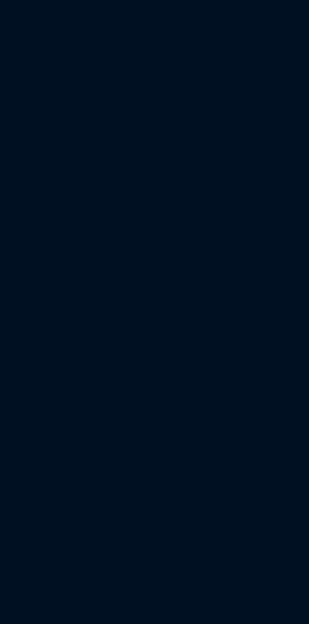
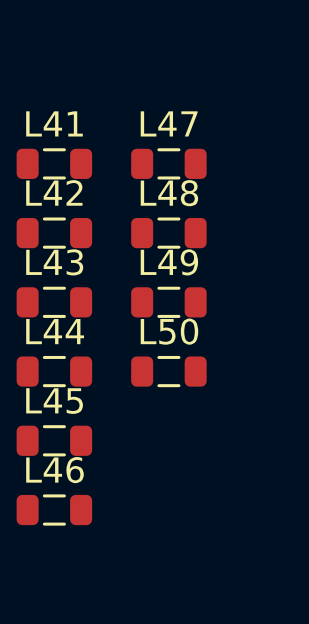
L41: none -> (54, 163)
L47: none -> (168, 163)
L42: none -> (54, 233)
L48: none -> (168, 233)
L43: none -> (54, 302)
L49: none -> (168, 302)
L44: none -> (54, 371)
L50: none -> (168, 371)
L45: none -> (54, 440)
L46: none -> (54, 510)

